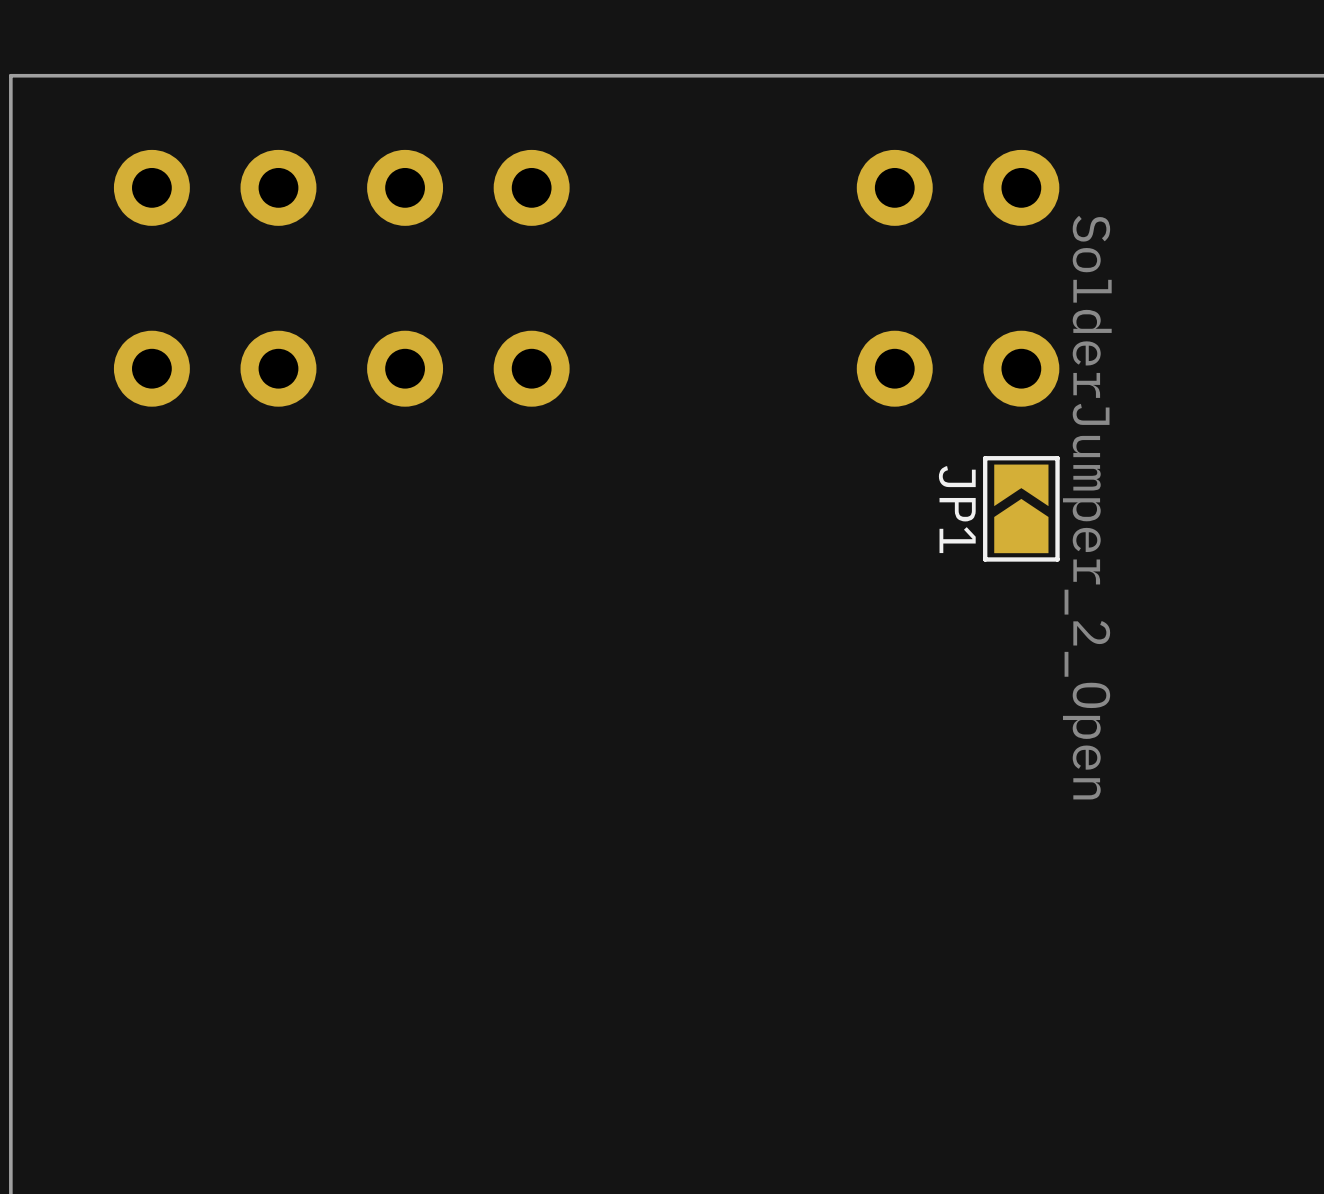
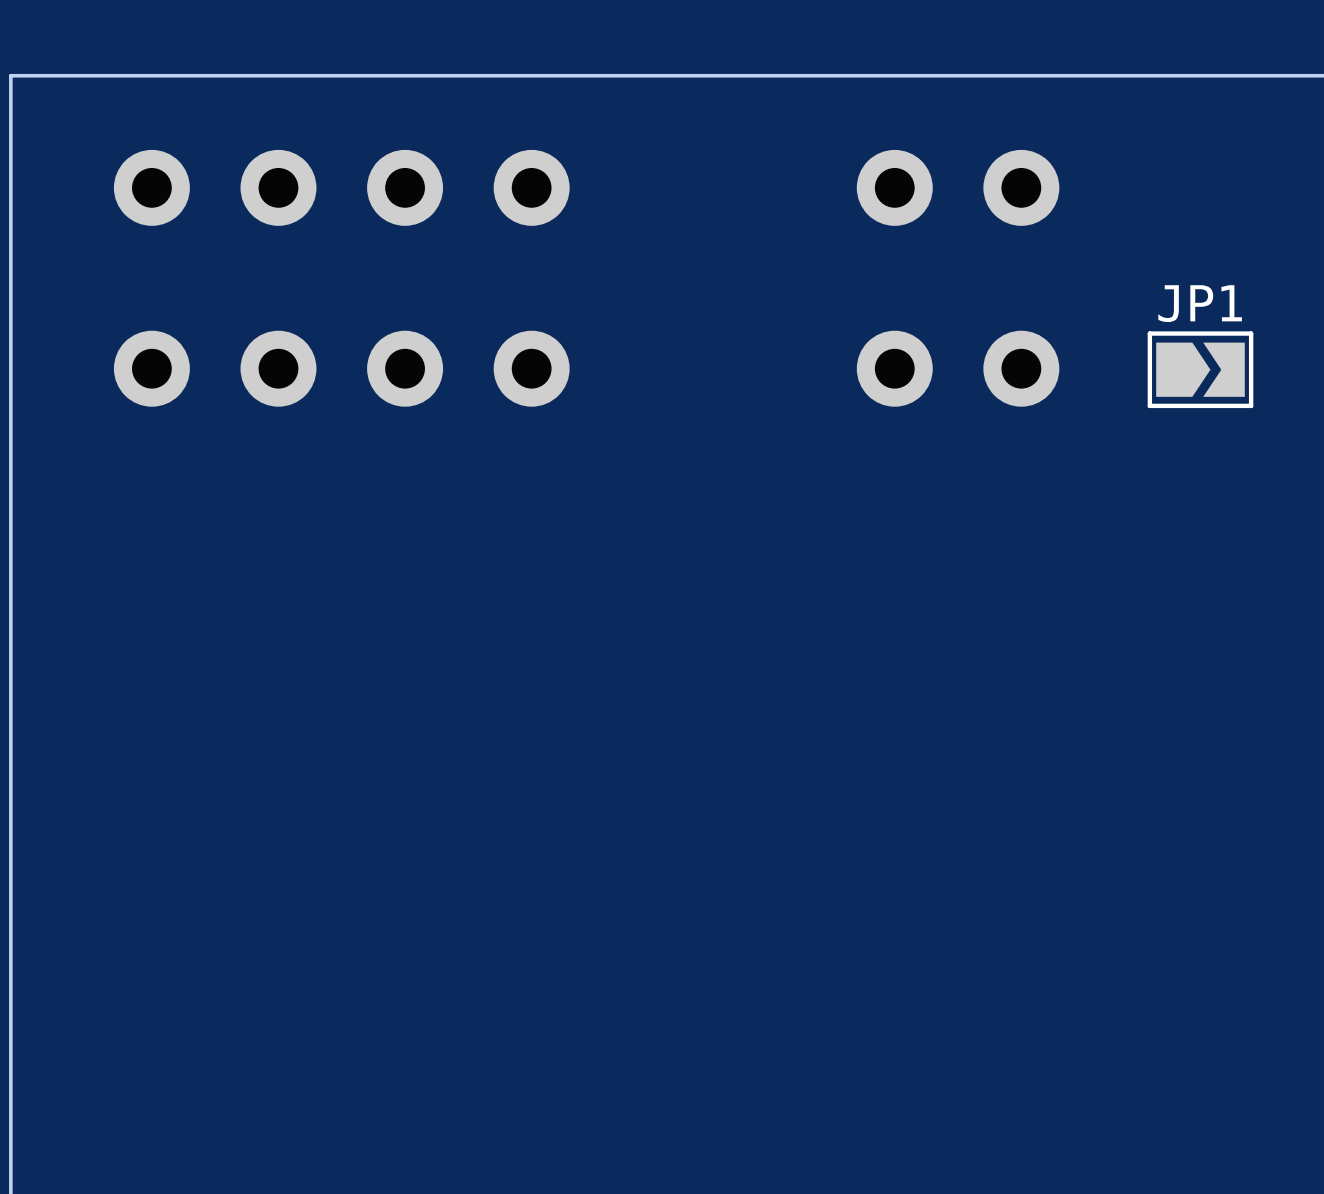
JP1 value: SolderJumper_2_Open (1087, 507) -> none
JP1 rotation: 0° (1021, 508) -> 90° clockwise (1200, 369)
JP1 position: (1021, 508) -> (1200, 369)

